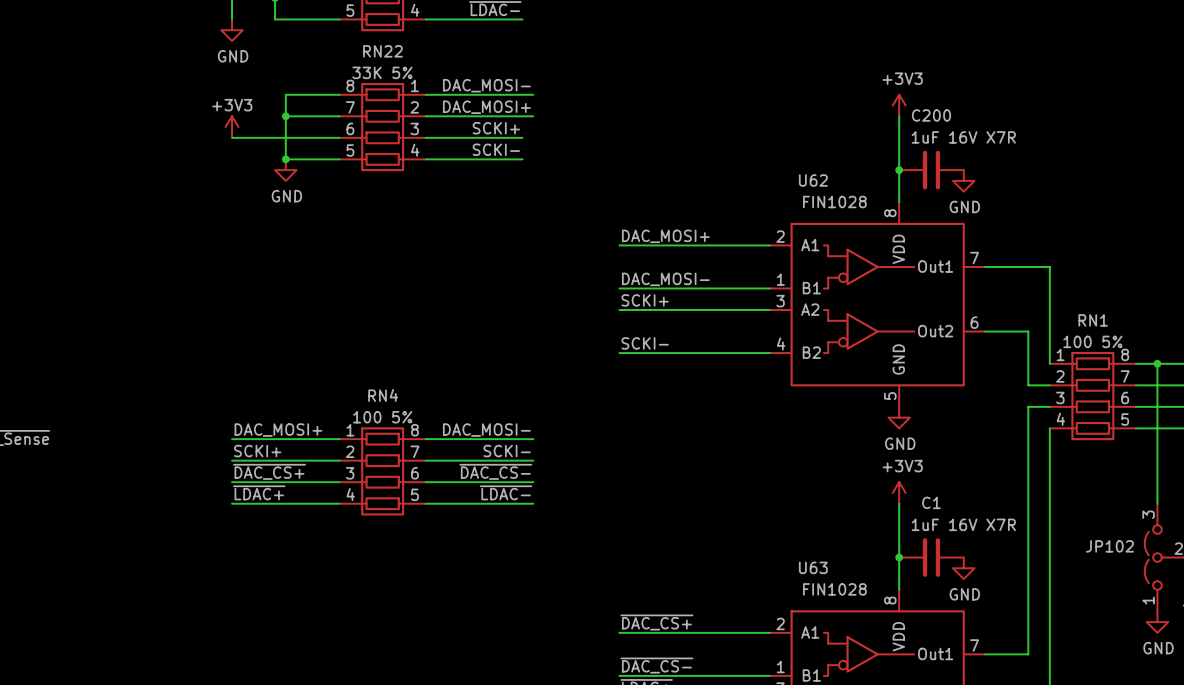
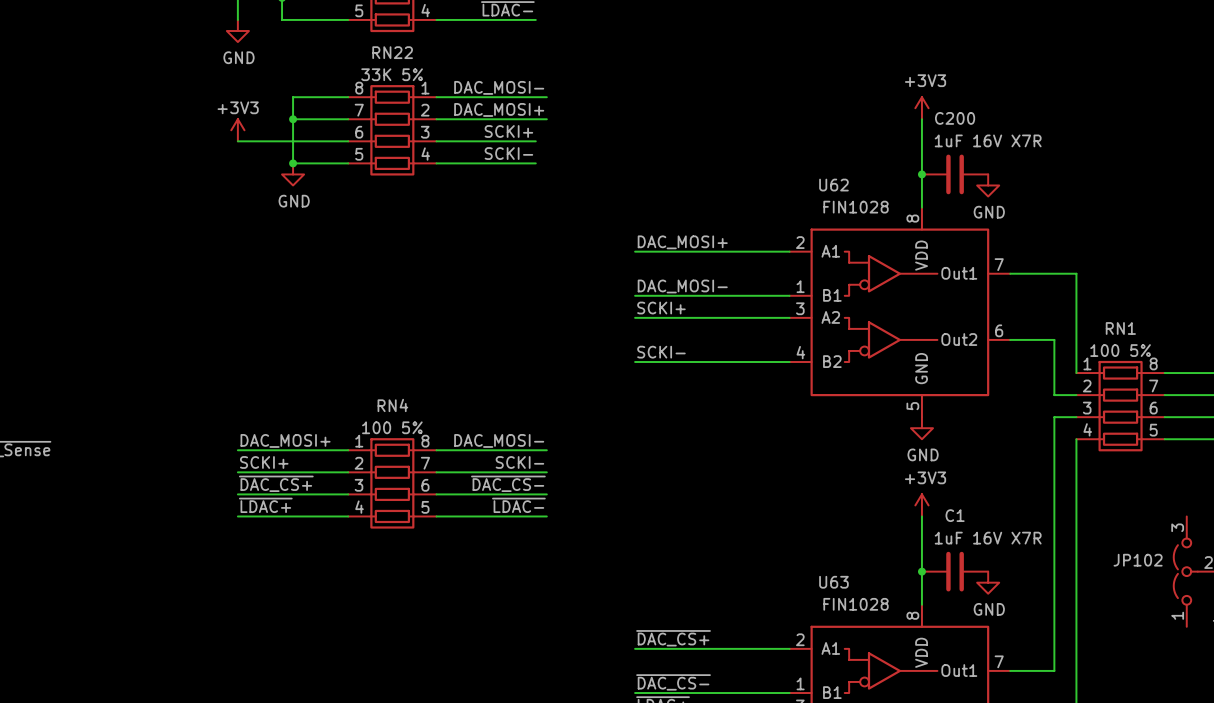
wire: (1157, 363) (1157, 503) -> none
junction: (1157, 363) -> none
power symbol: GND (1157, 622) -> none

